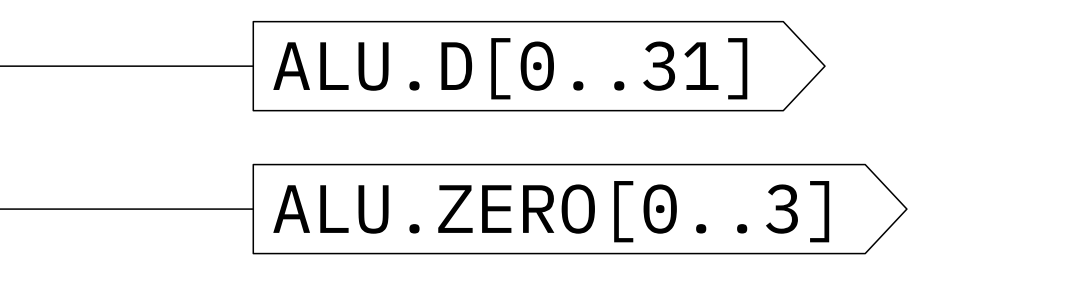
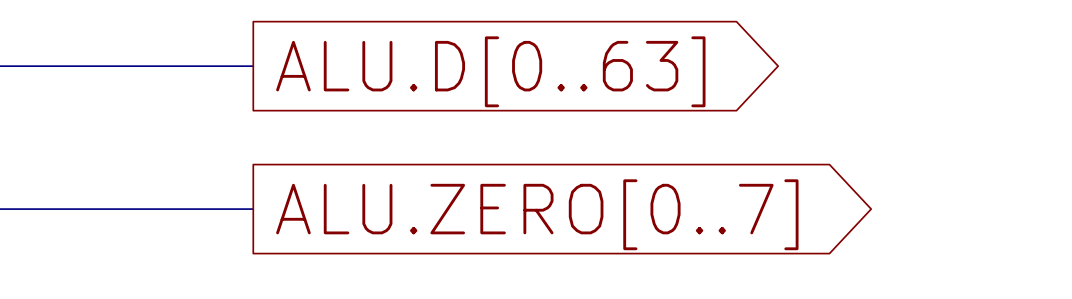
global label: ALU.D[0..31] (510, 68) -> ALU.D[0..63] (490, 71)
global label: ALU.ZERO[0..3] (551, 211) -> ALU.ZERO[0..7] (537, 214)

